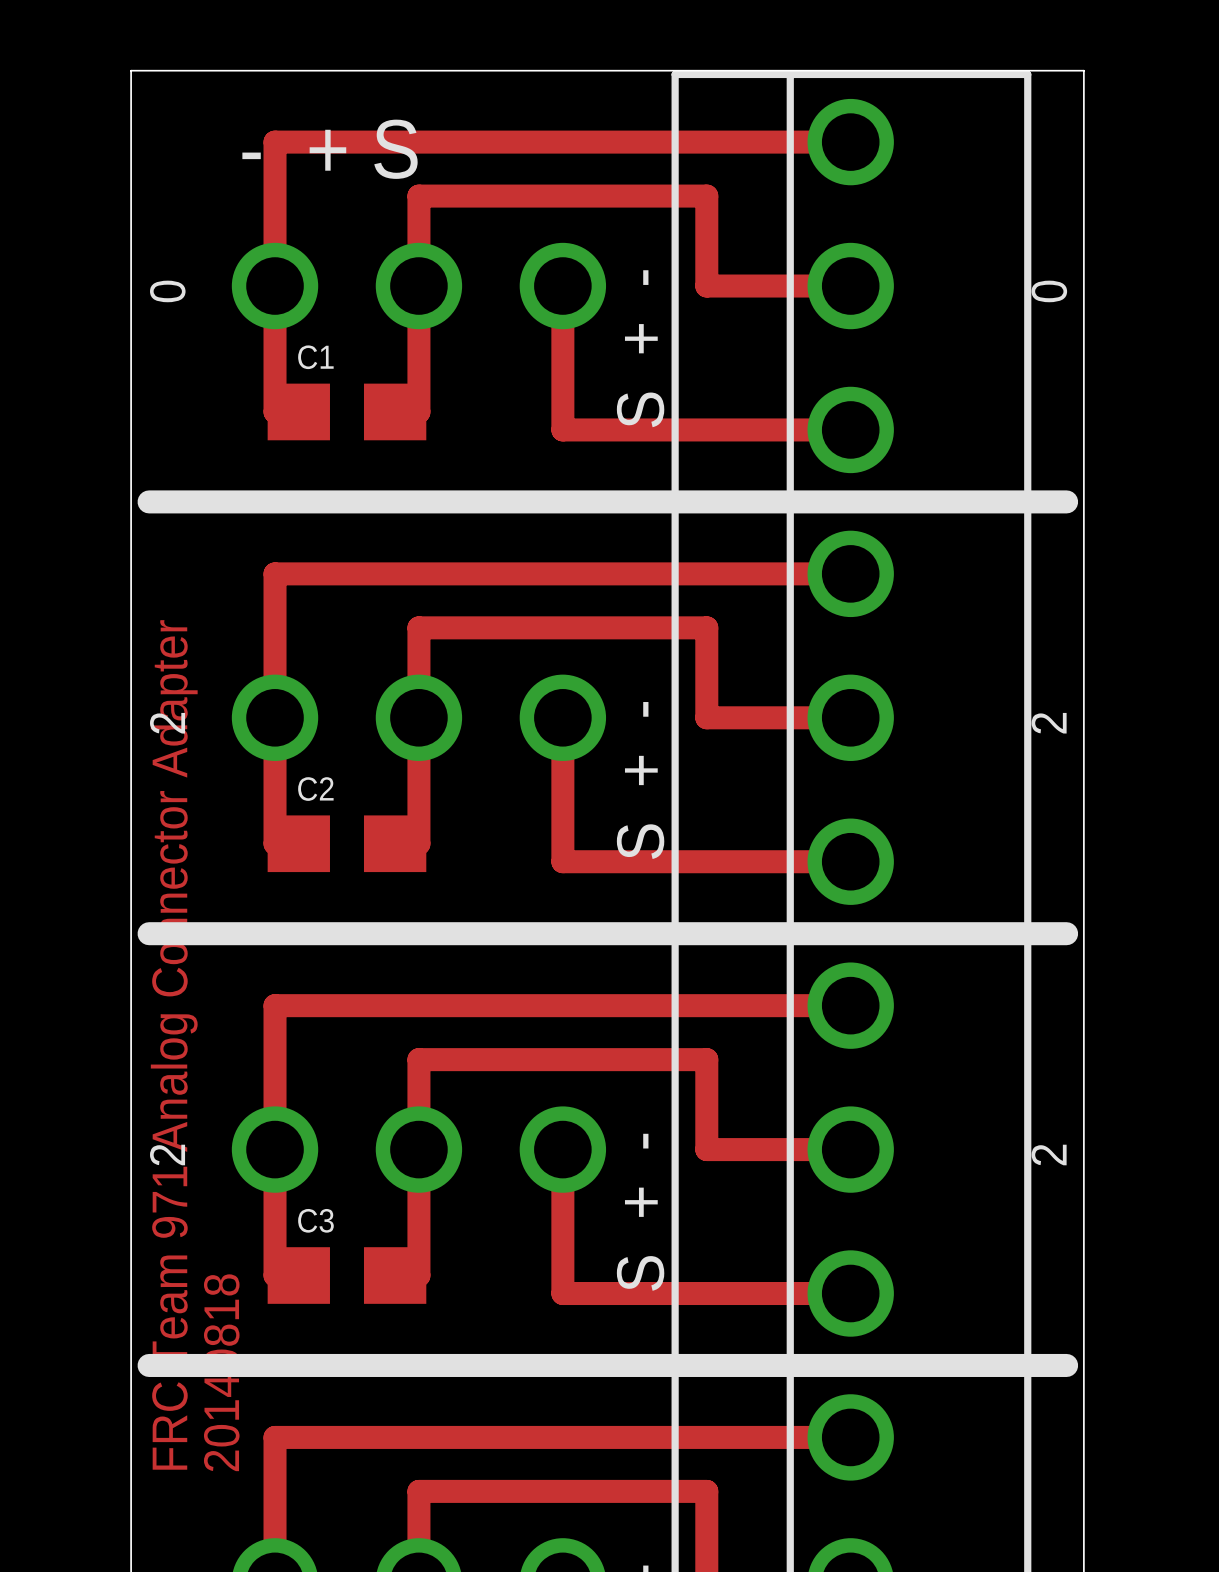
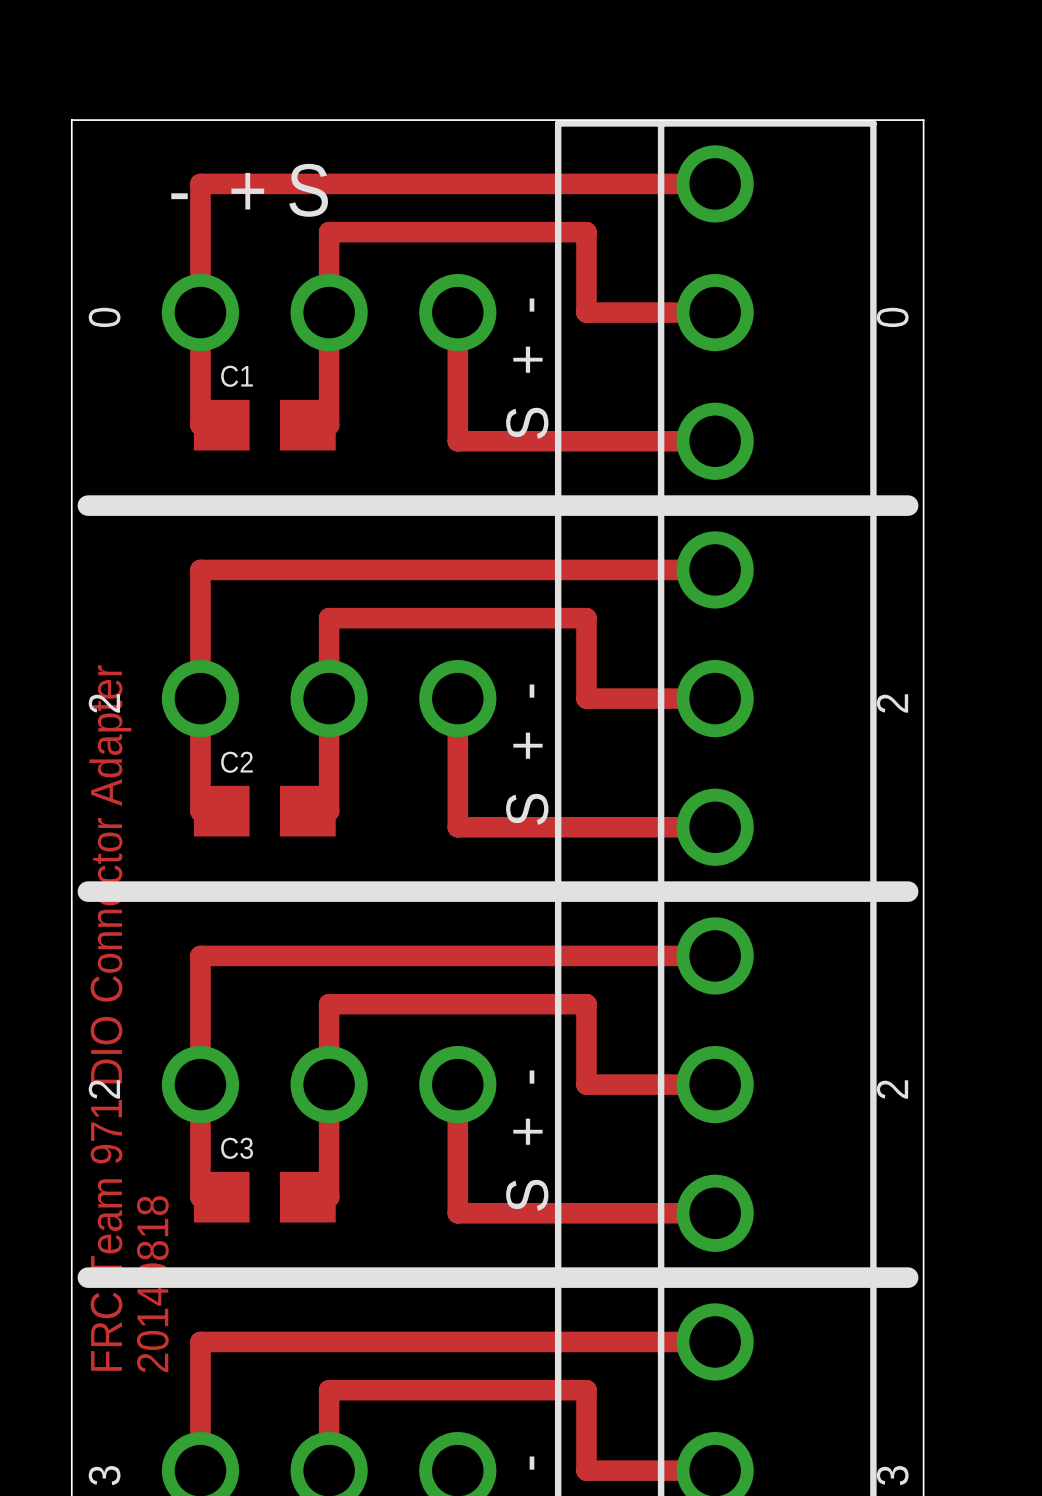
text: FRC Team 971 Analog Connector Adapter (174, 1044) -> FRC Team 971 DIO Connector Adapter (110, 1018)

